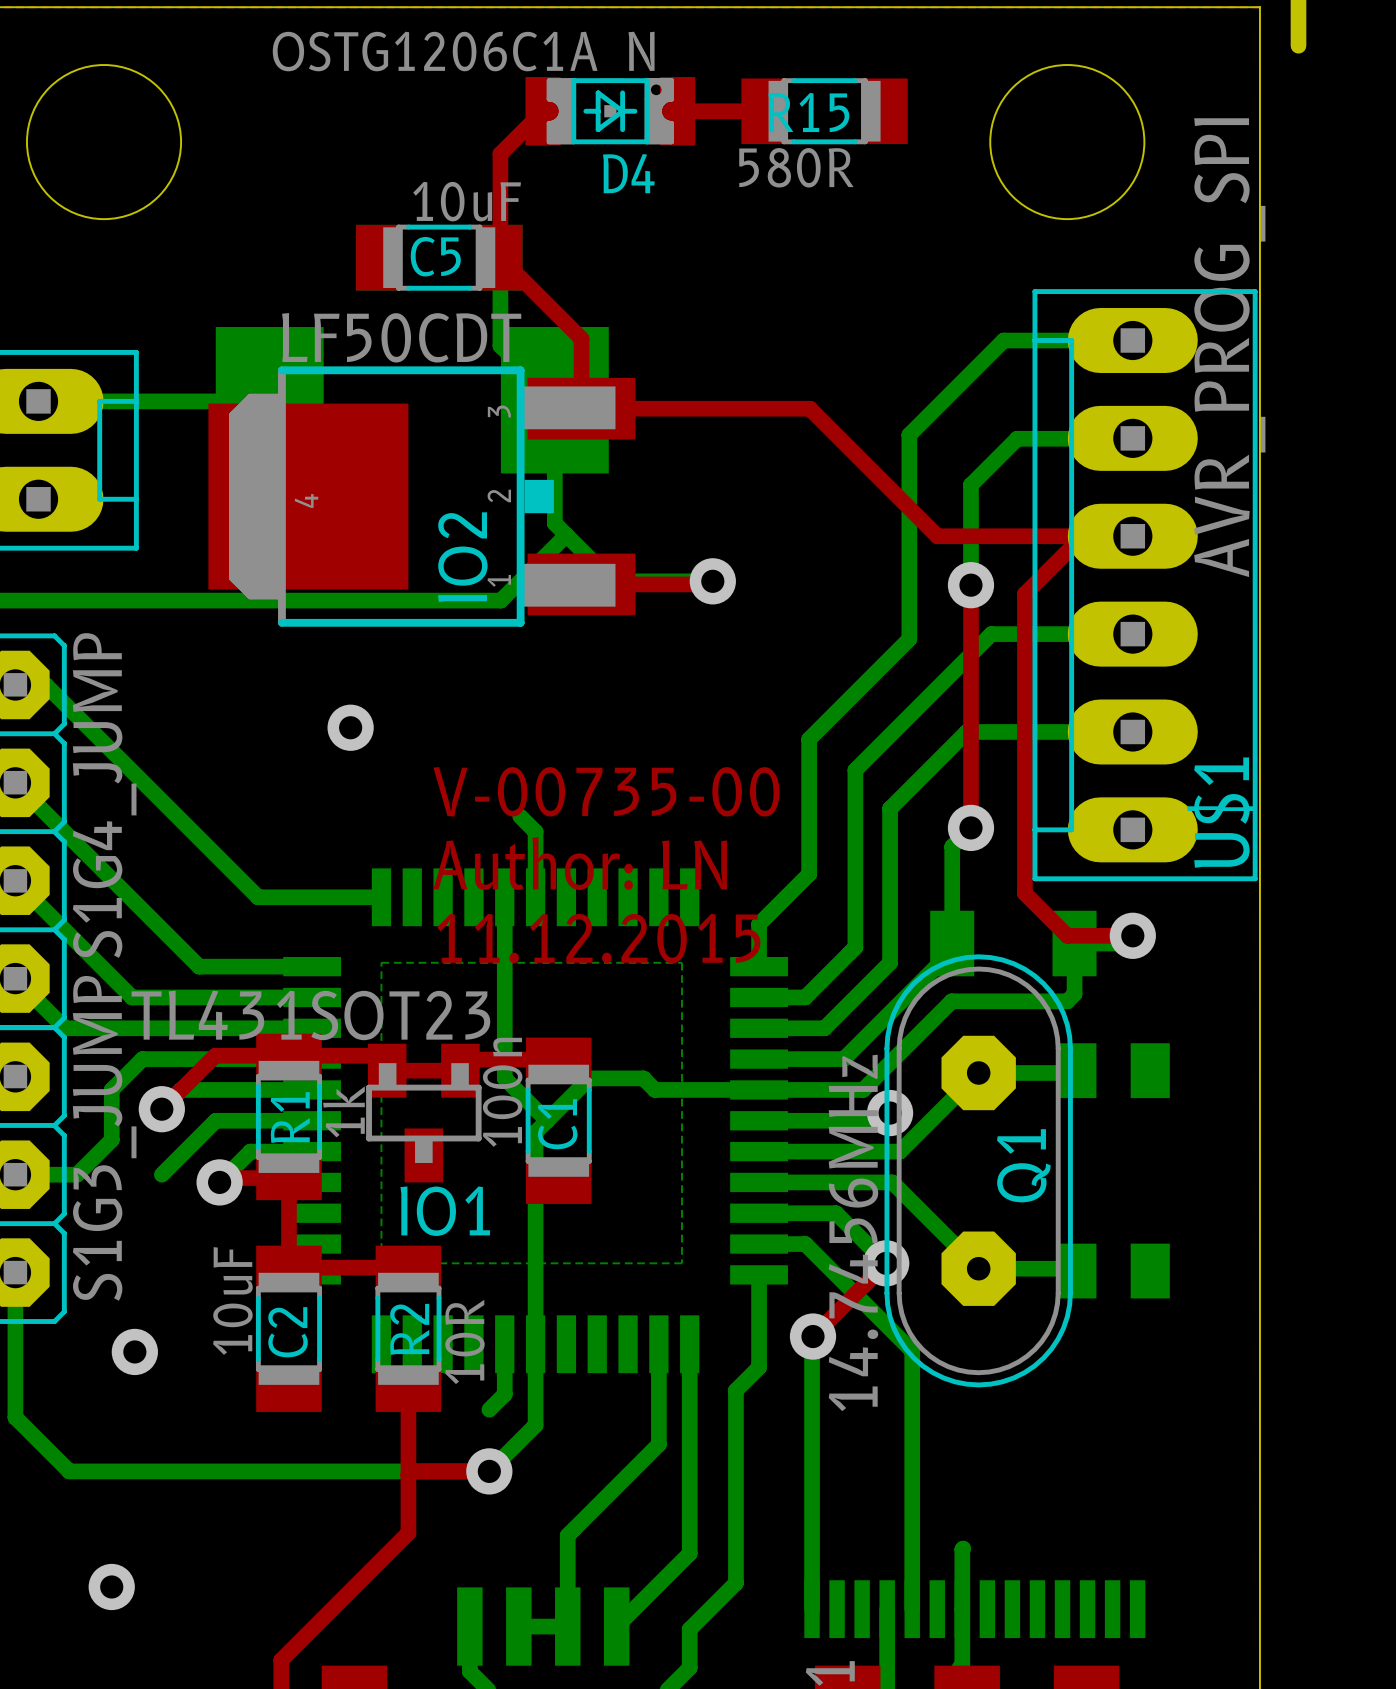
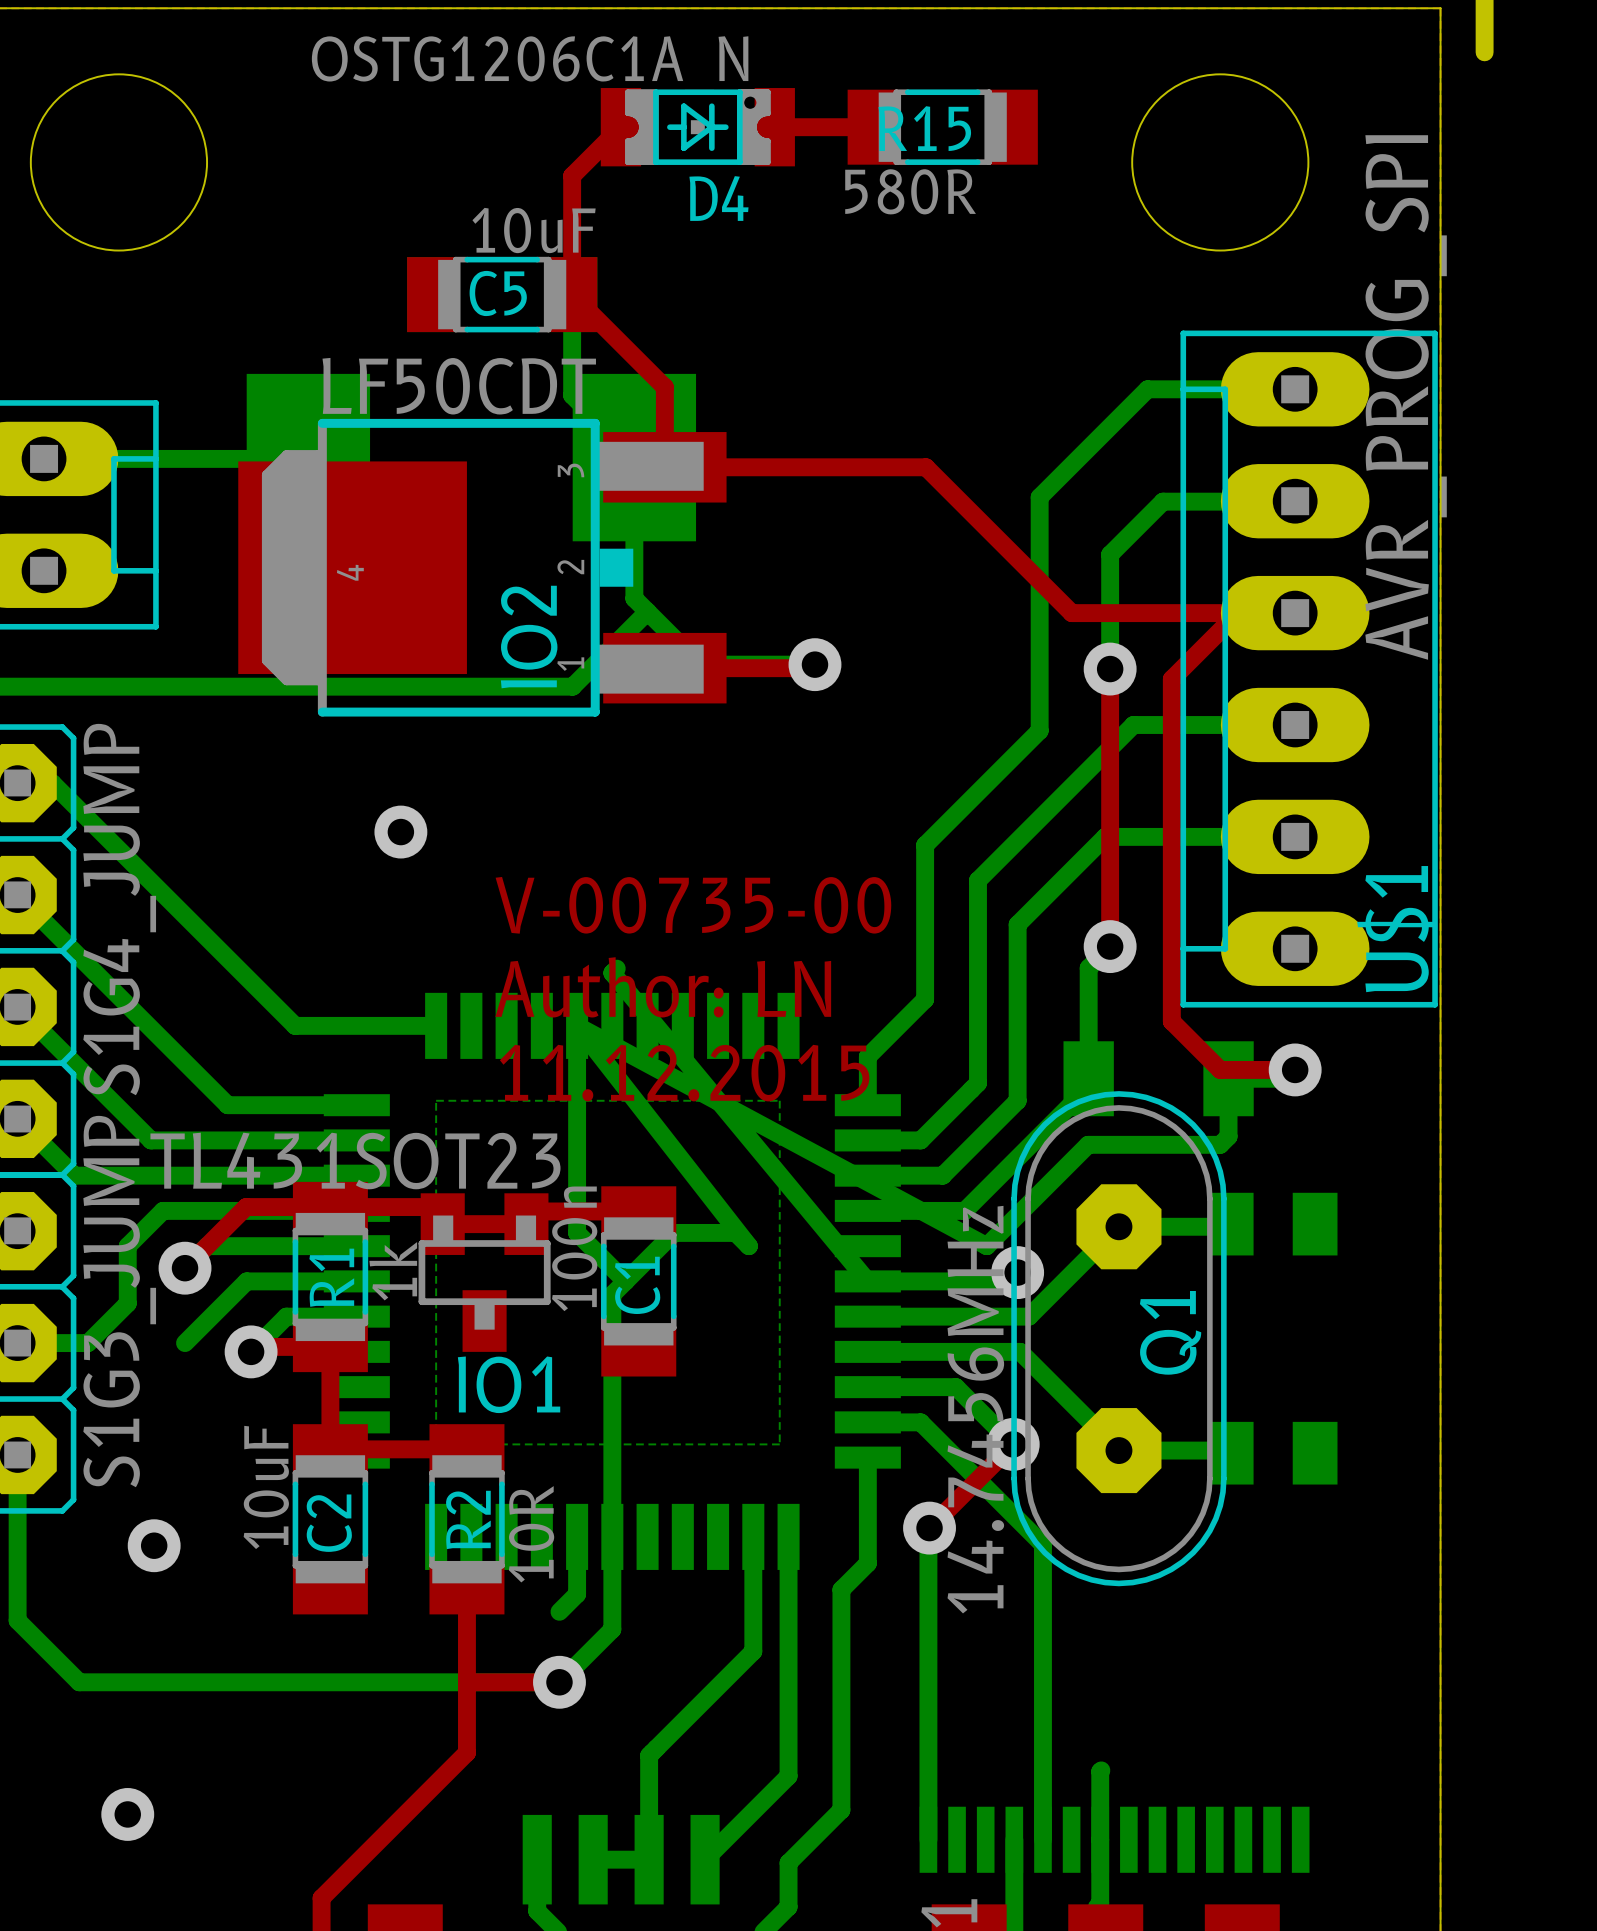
bottom track: (520, 816) (535, 831) (535, 897) -> none
bottom track: none -> (616, 968) (612, 973) (867, 1281)
bottom track: (655, 1089) (863, 1089) -> (748, 1246) (577, 1025) (986, 1246)

